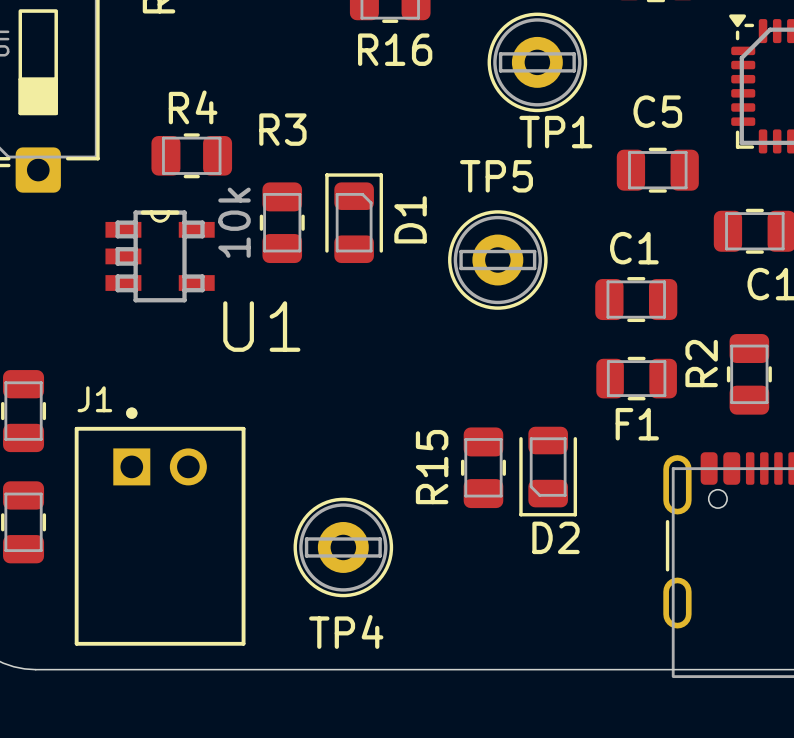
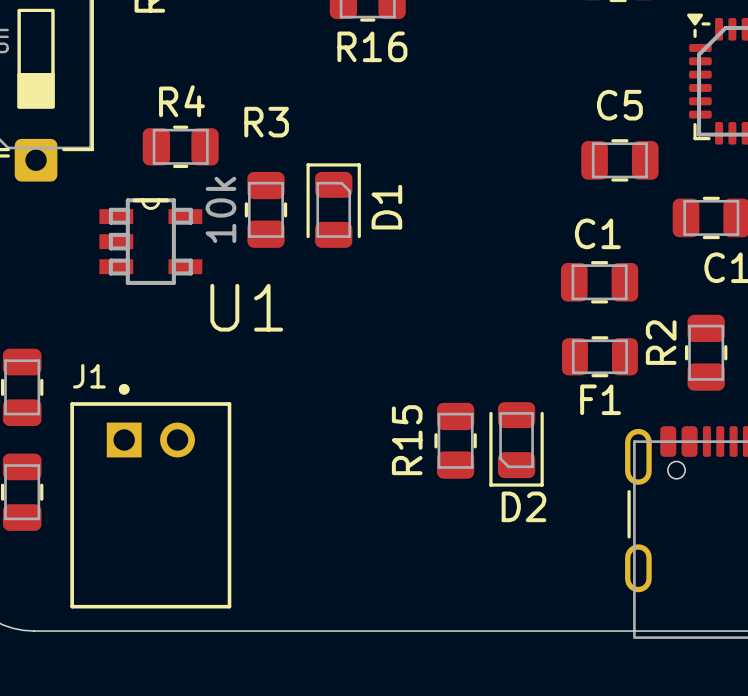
TP1: (537, 62) -> none
TP5: (497, 260) -> none
TP4: (343, 547) -> none

